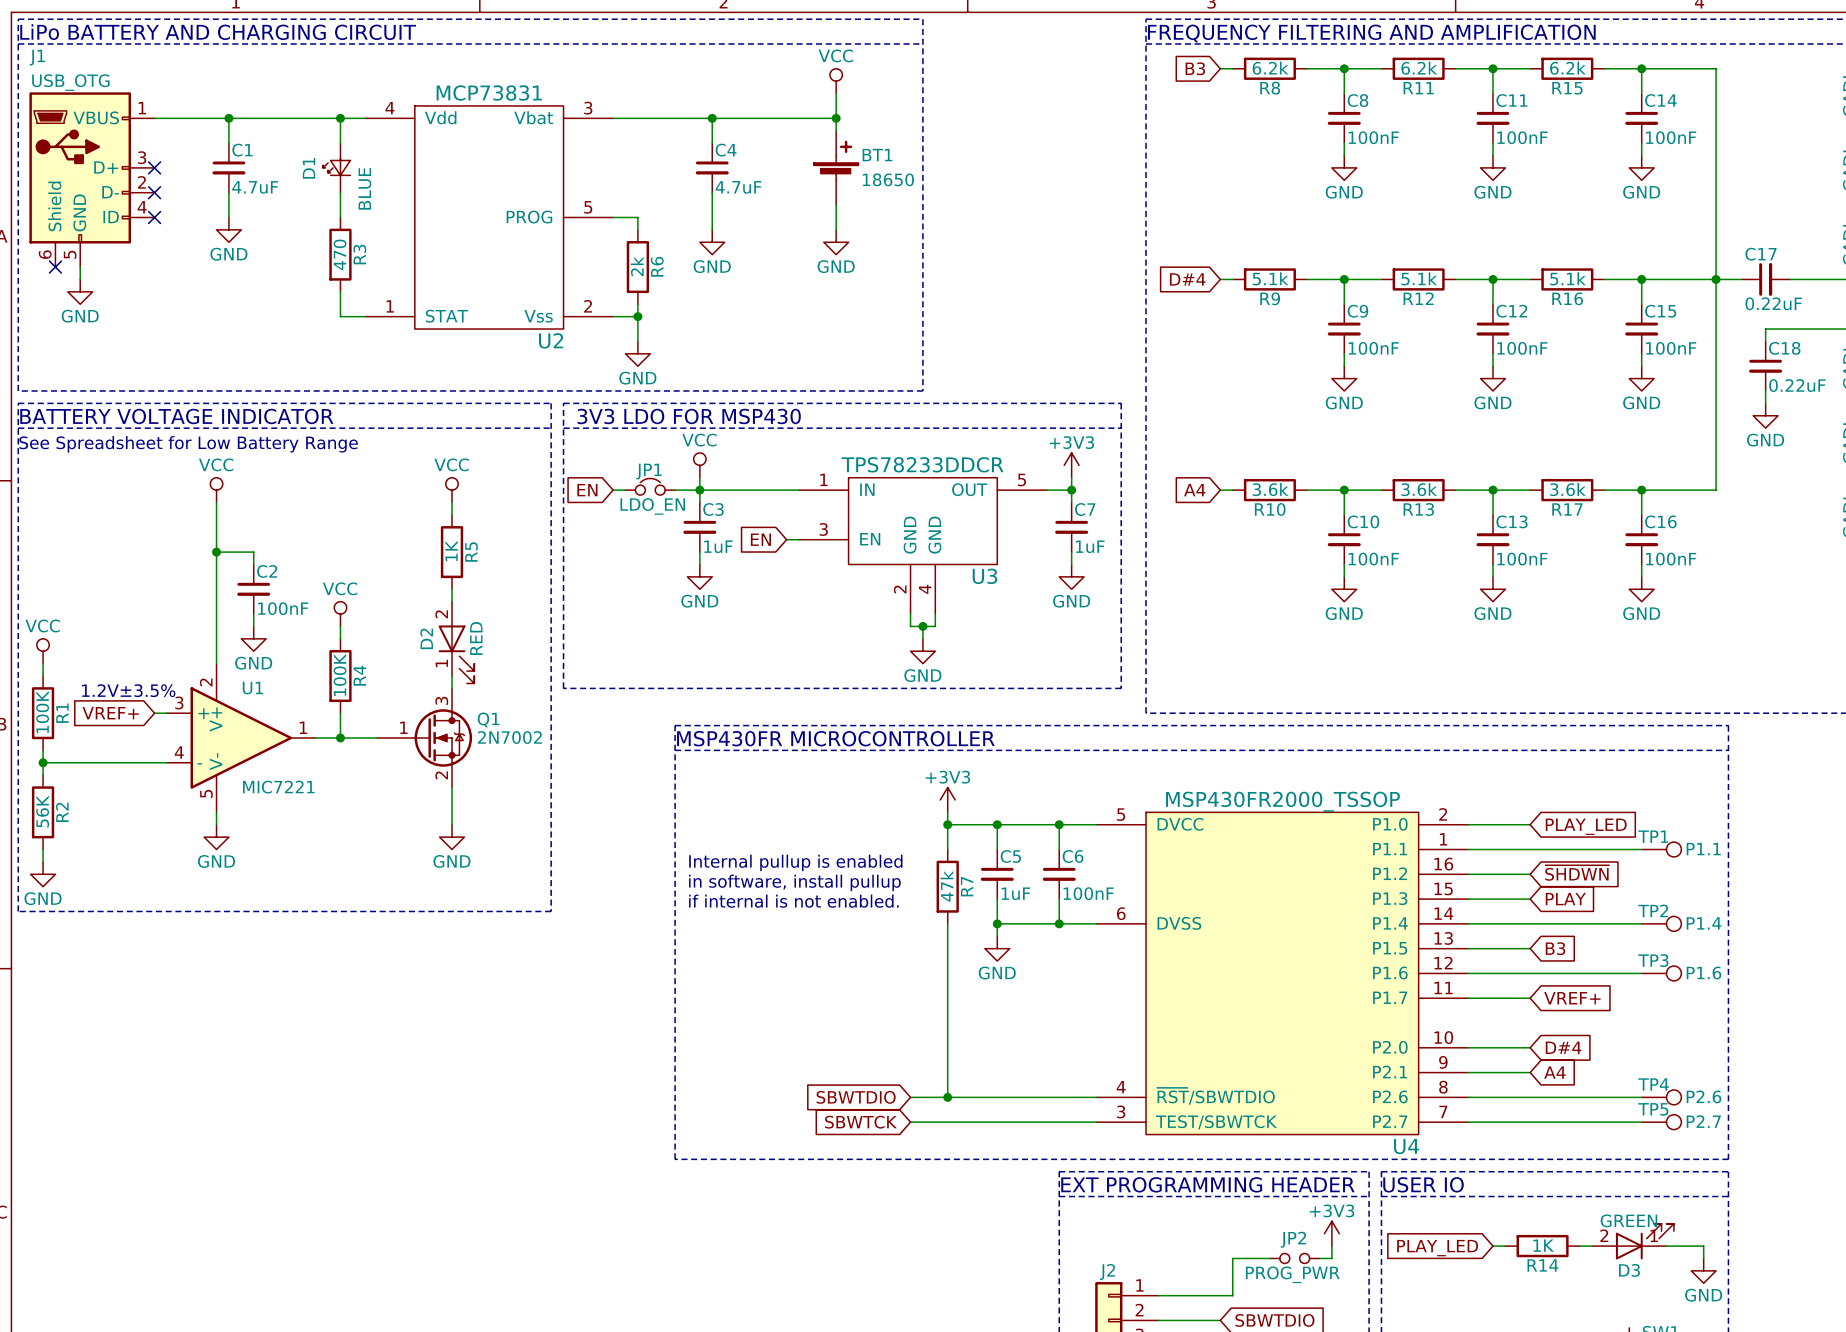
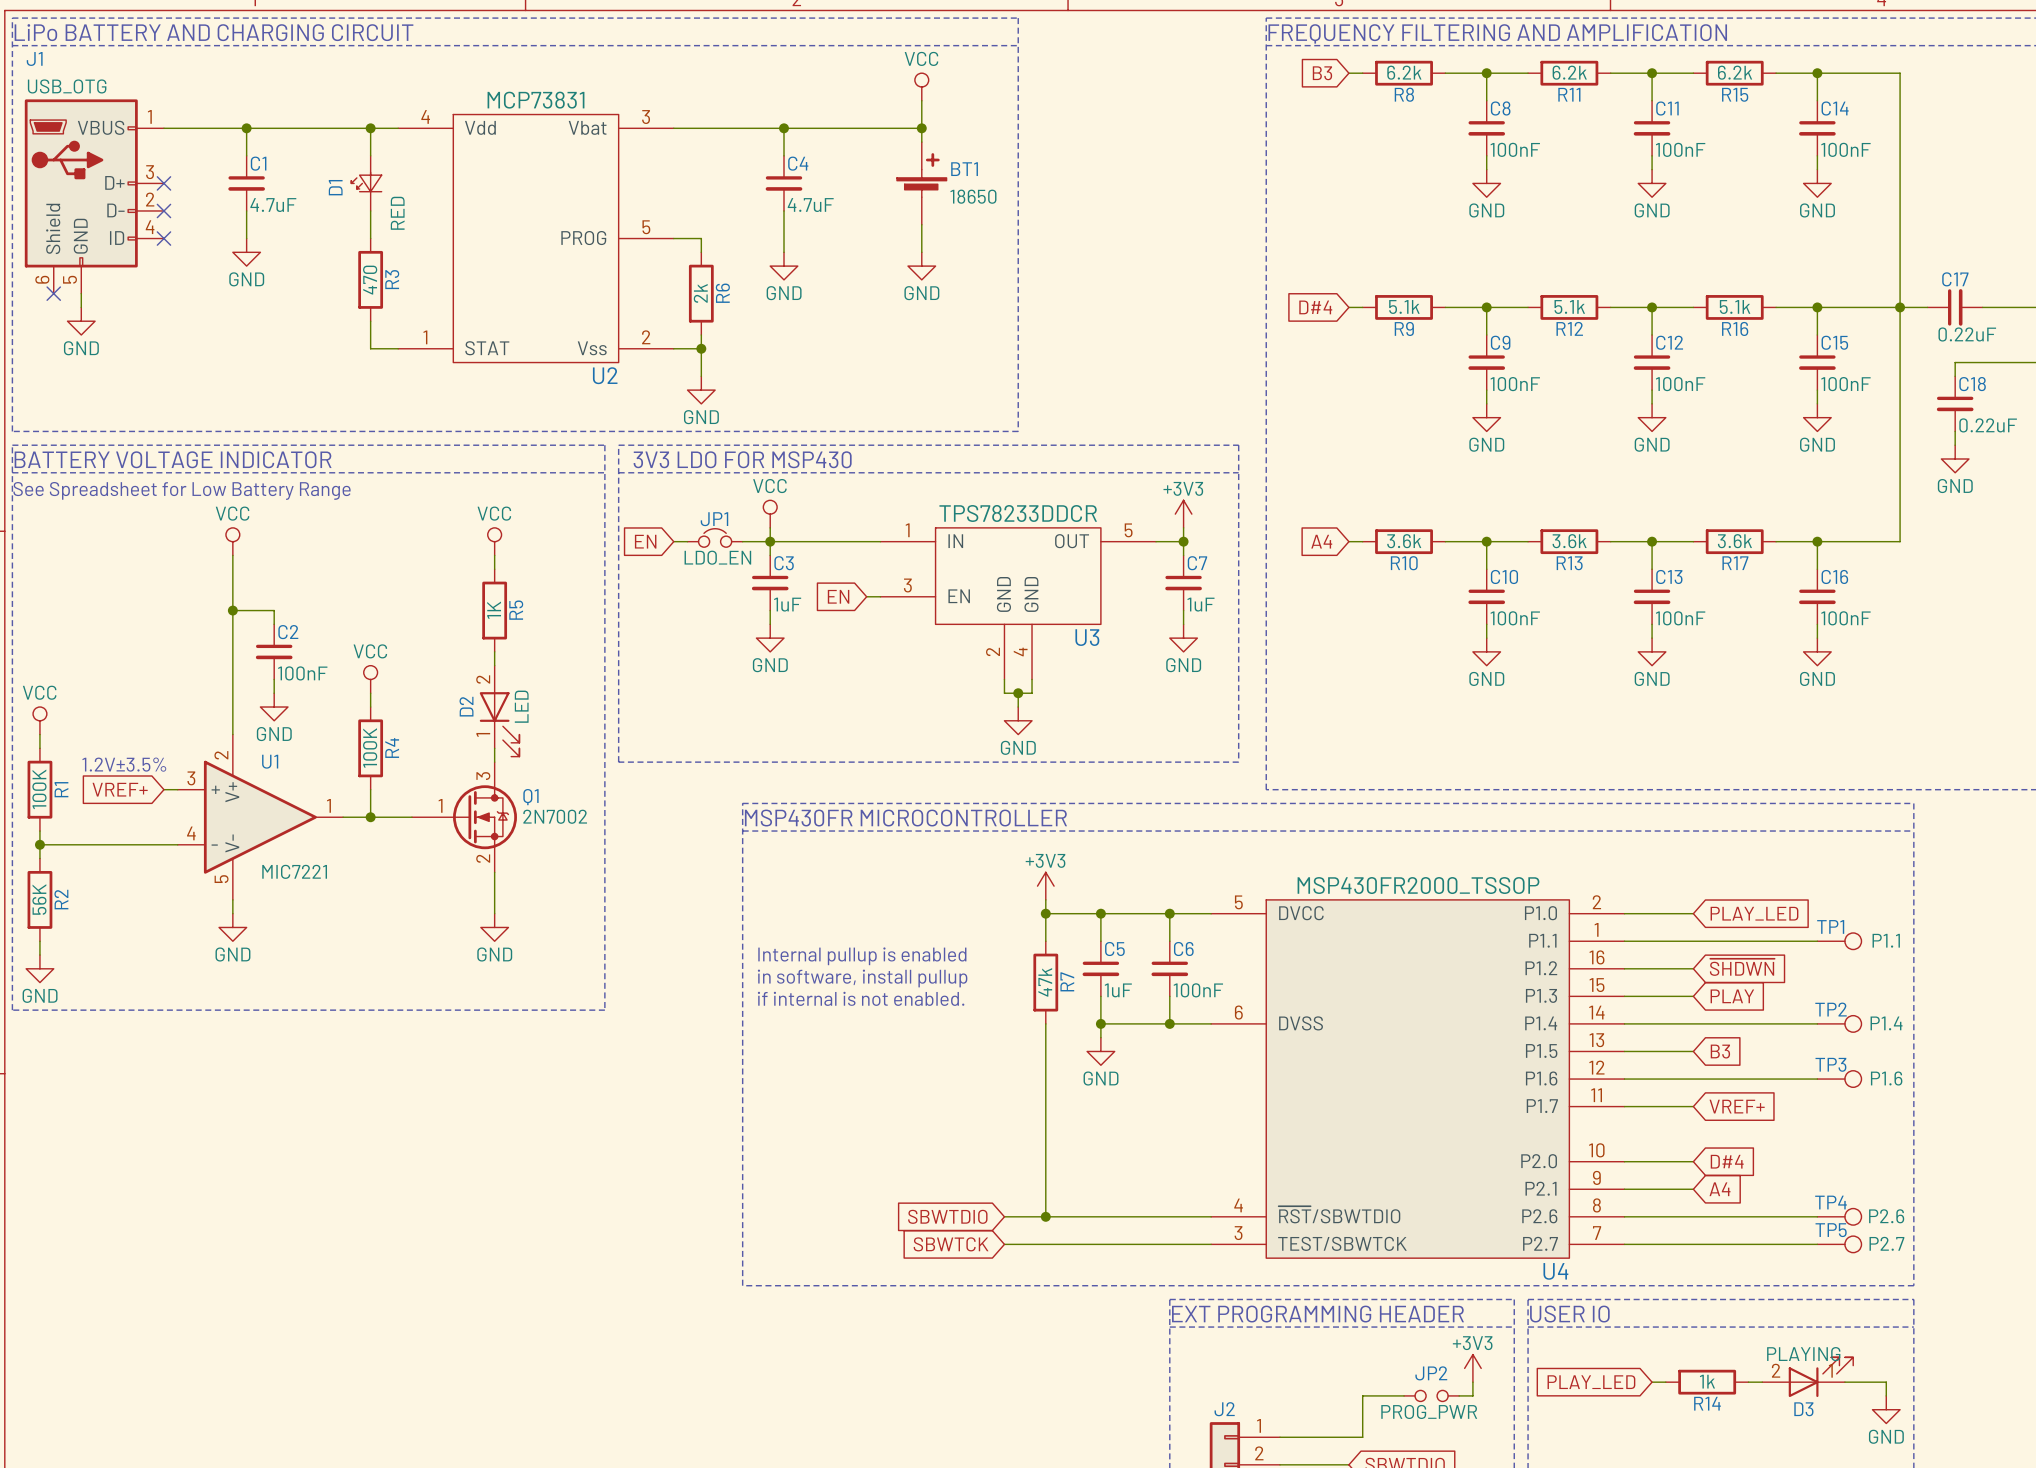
D1 value: BLUE (364, 188) -> RED (397, 213)
D2 value: RED (476, 638) -> LED (521, 706)
D3 value: GREEN (1628, 1220) -> PLAYING (1803, 1354)
R14 value: 1K (1543, 1245) -> 1k (1707, 1381)

